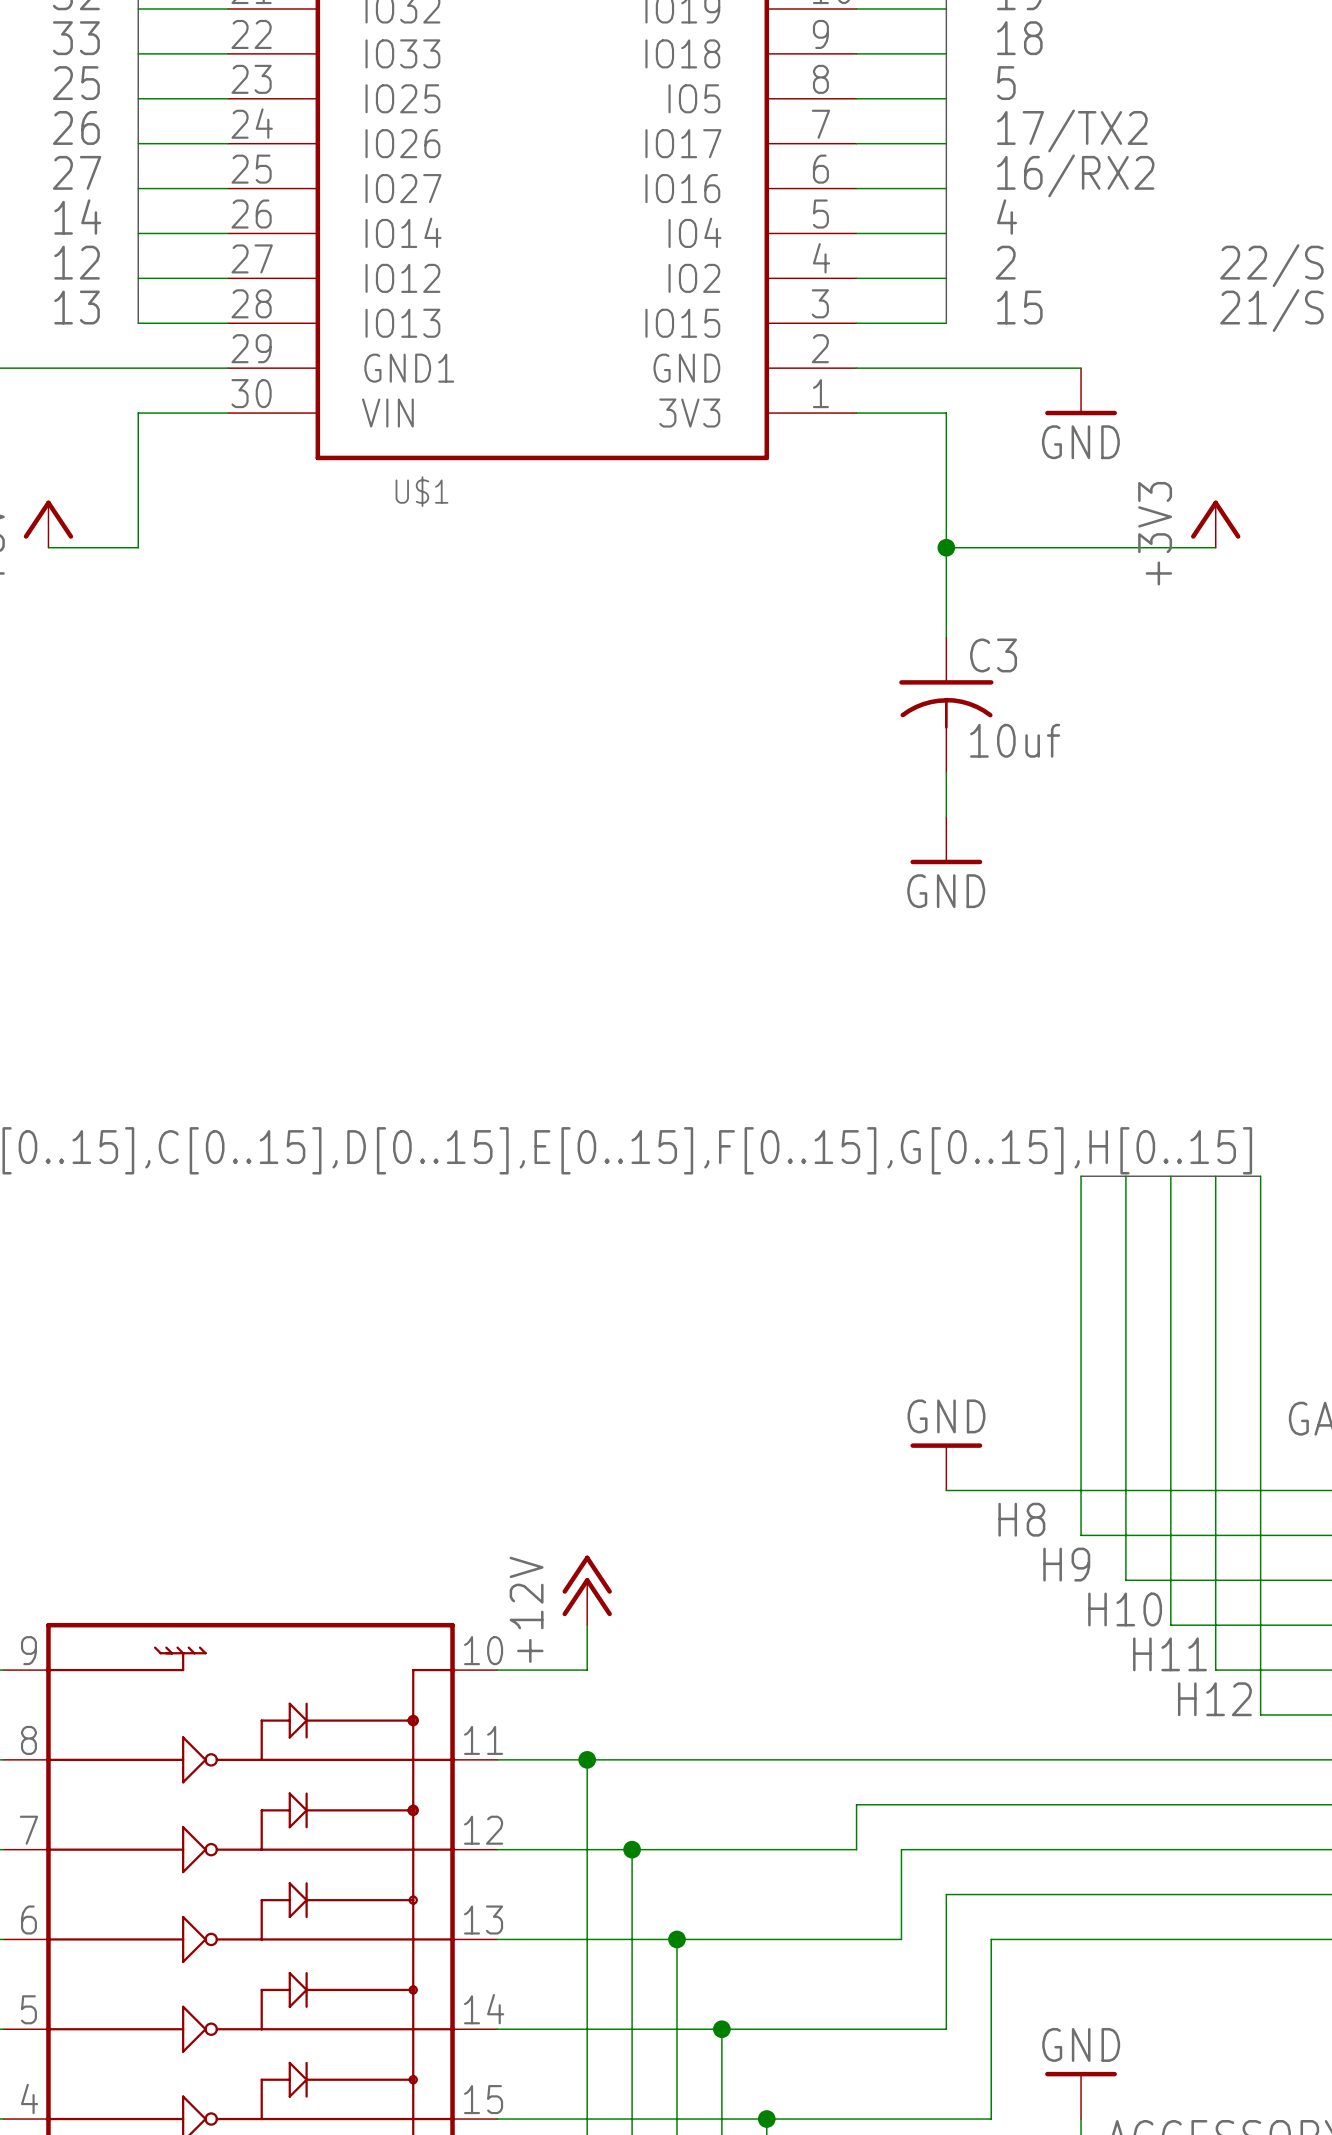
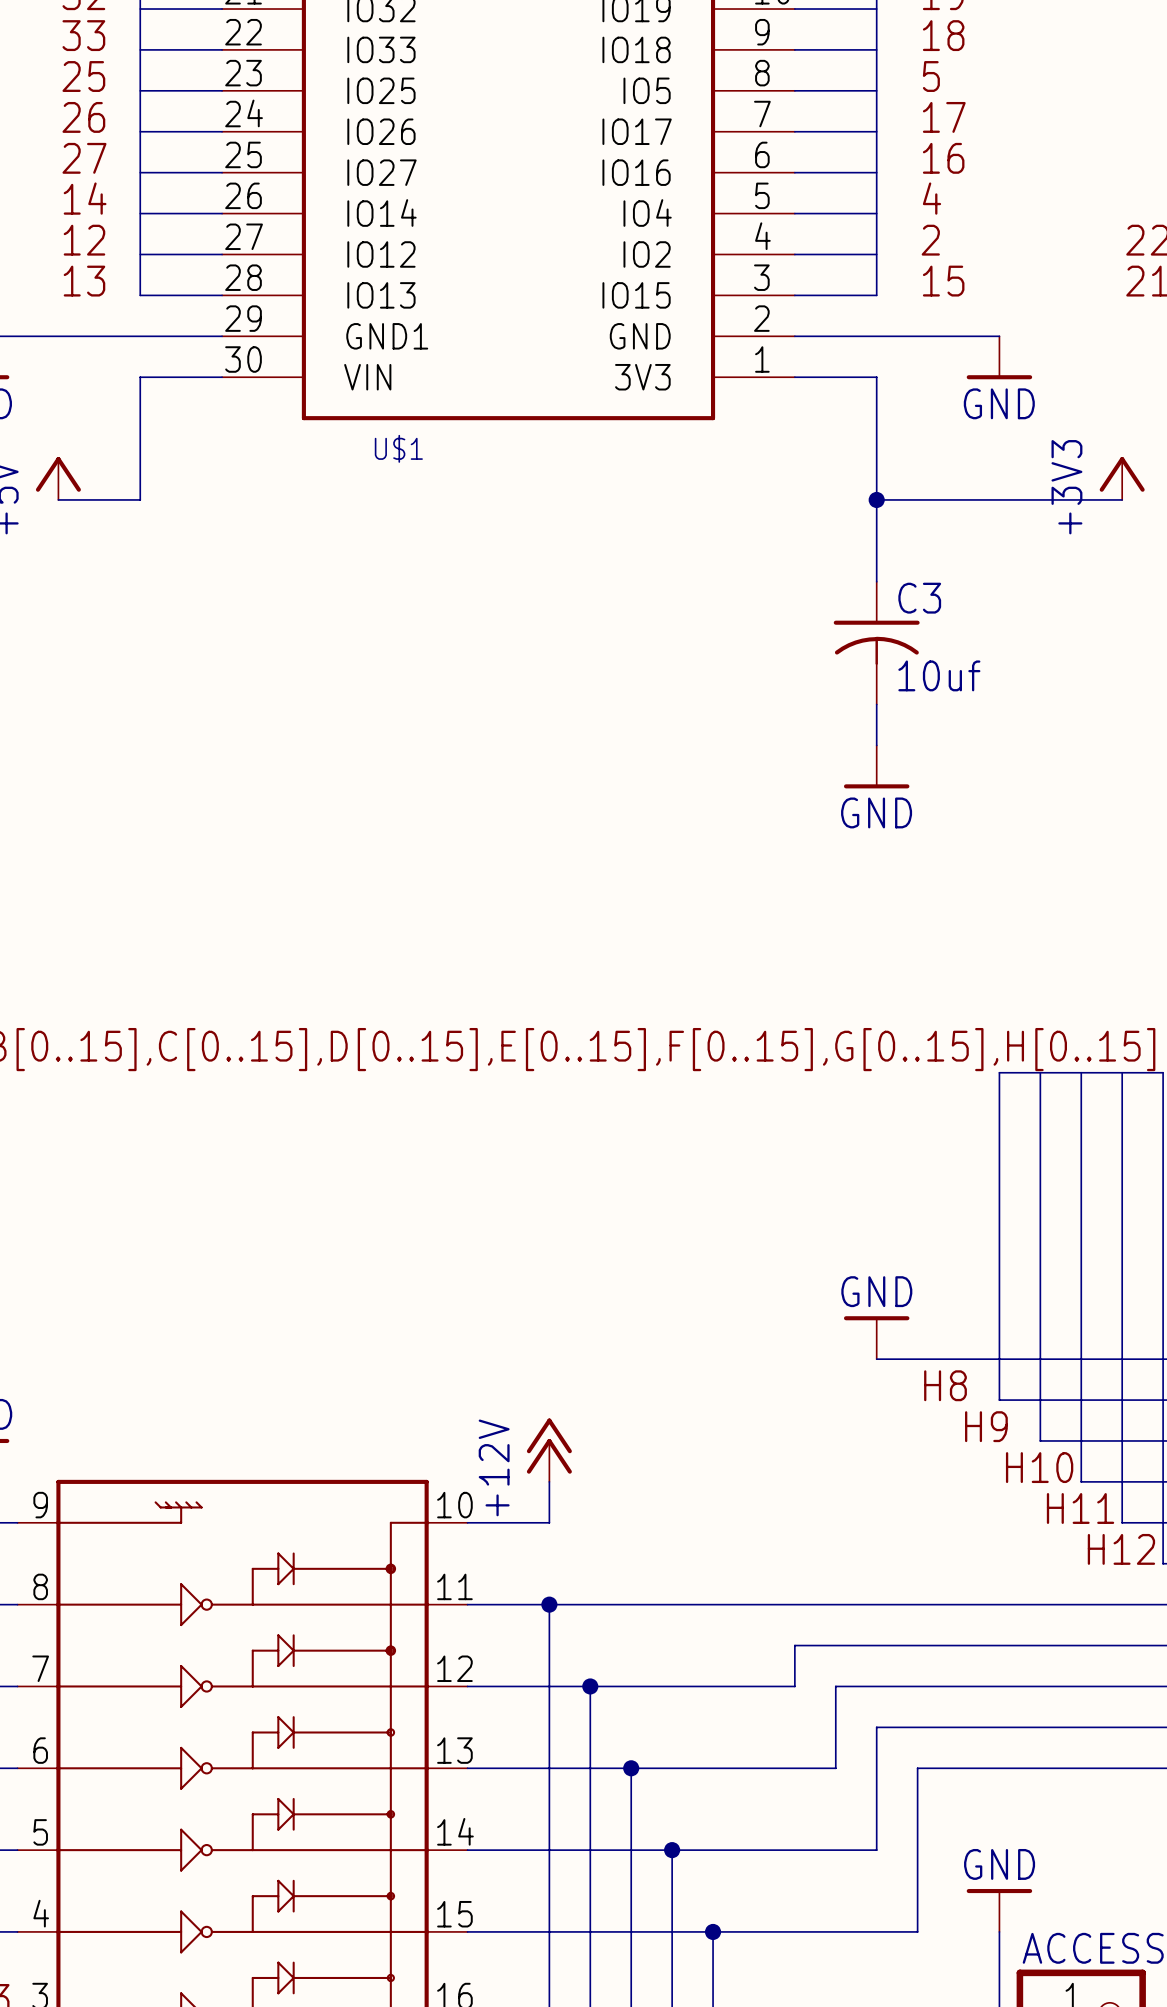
label: 17/TX2 (1072, 130) -> 17 (944, 117)
label: 16/RX2 (1075, 175) -> 16 (943, 158)

